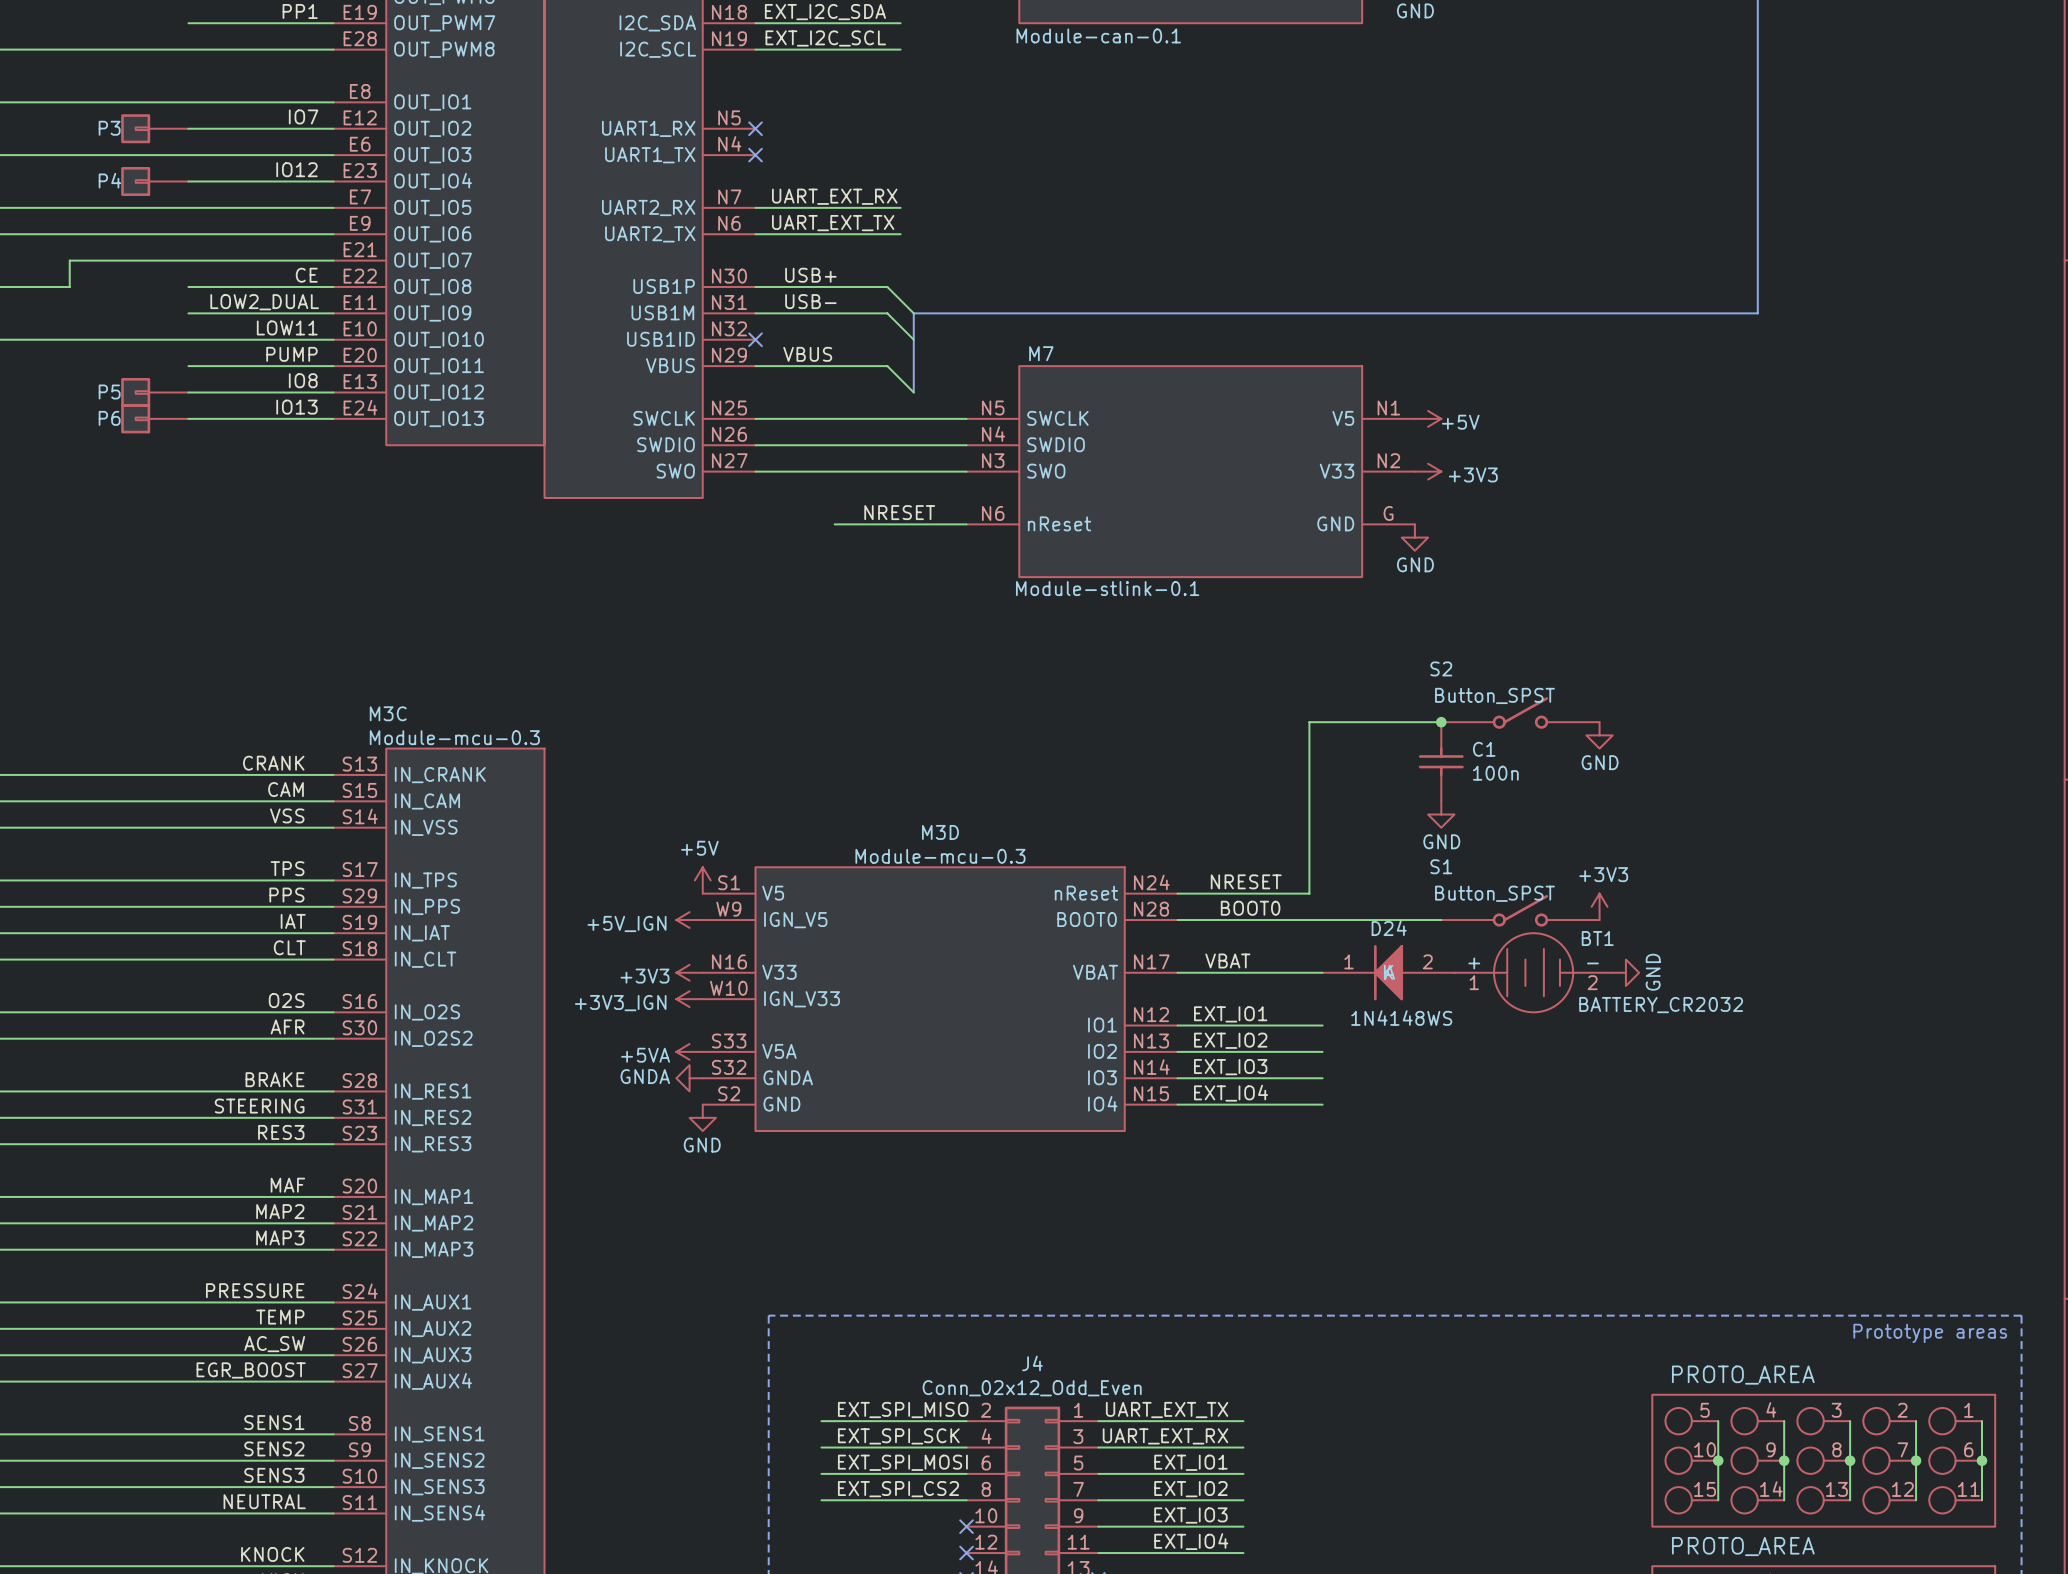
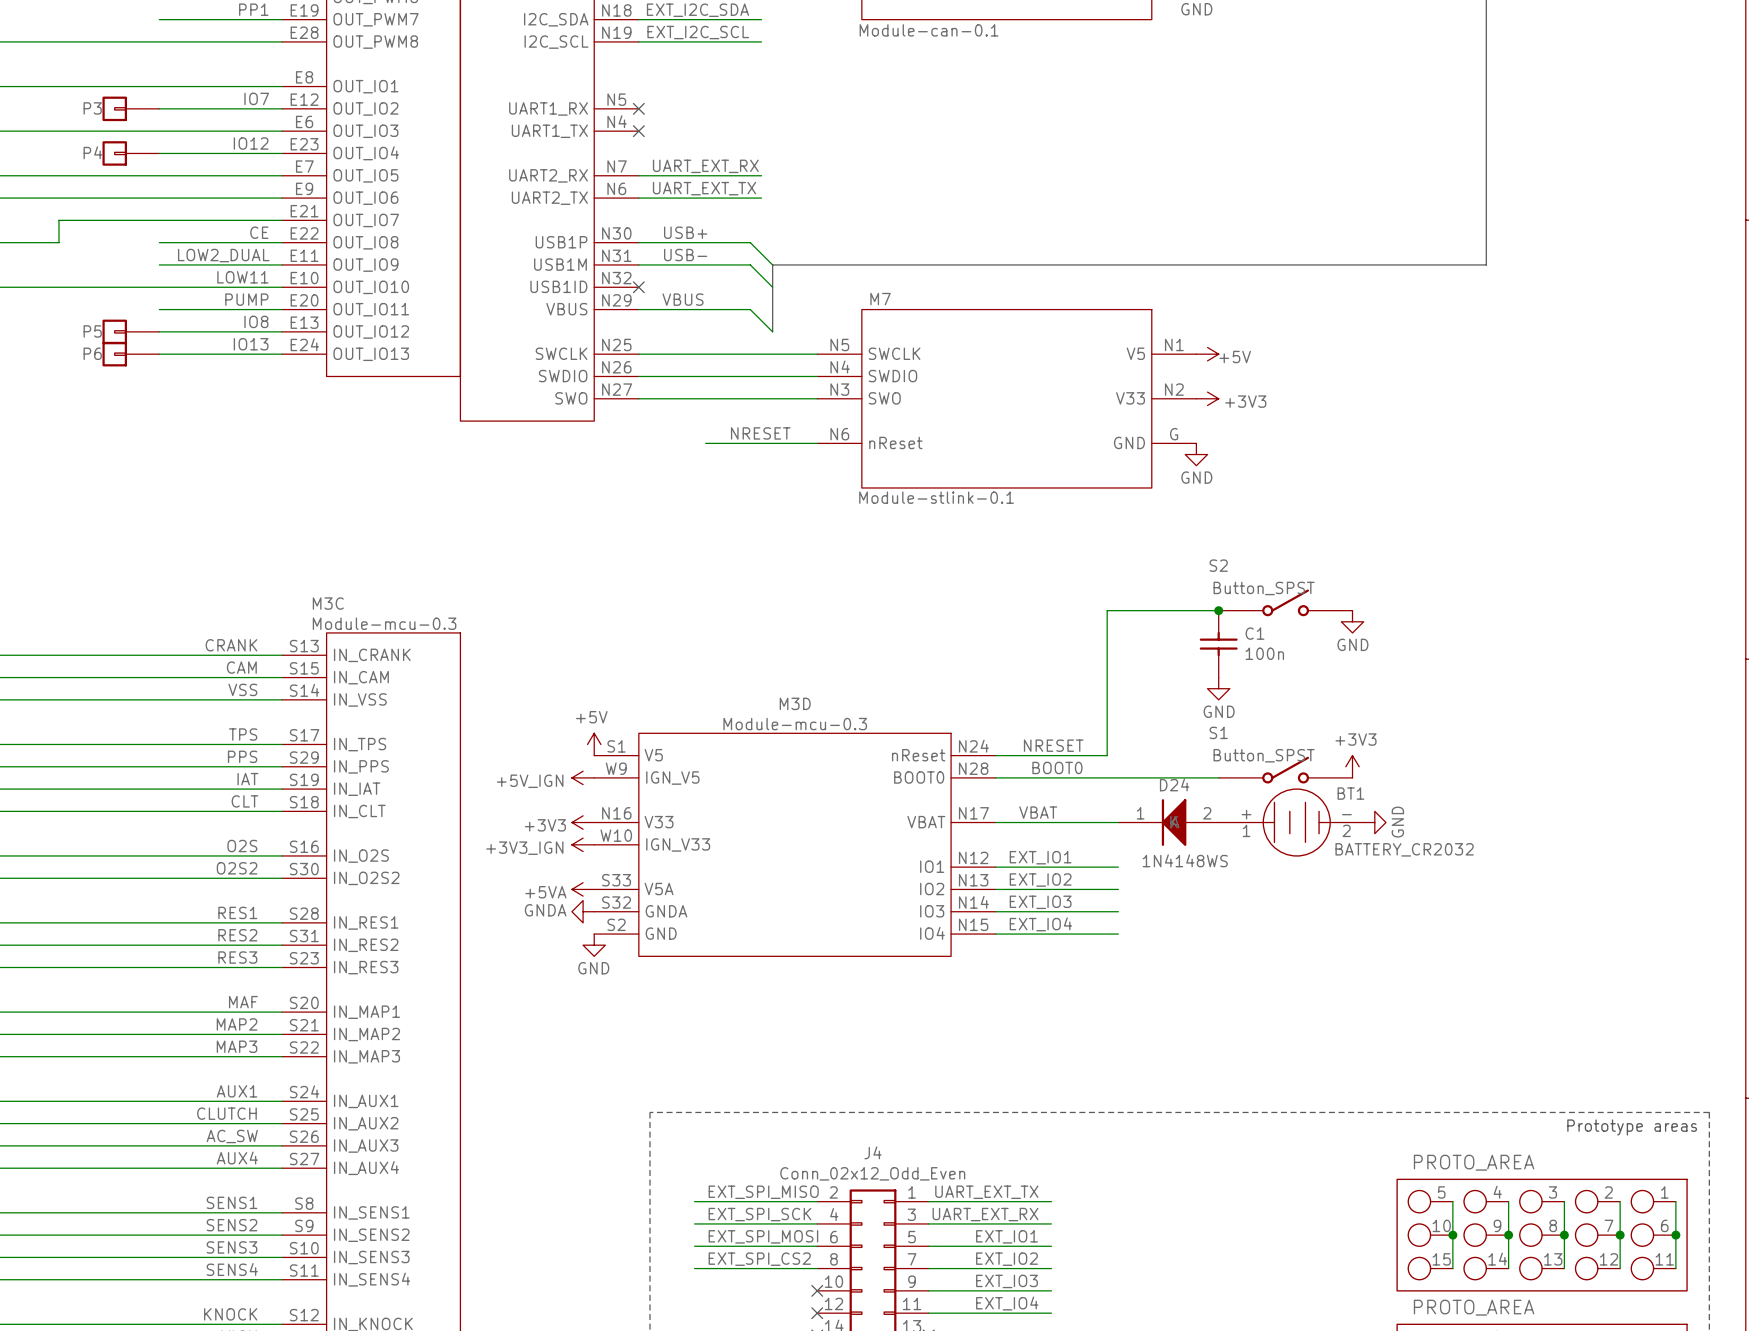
label: AFR (287, 1026) -> O2S2 (237, 868)
label: BRAKE (275, 1079) -> RES1 (237, 912)
label: STEERING (259, 1106) -> RES2 (237, 935)
label: PRESSURE (255, 1290) -> AUX1 (237, 1091)
label: TEMP (280, 1317) -> CLUTCH (226, 1113)
label: EGR_BOOST (251, 1370) -> AUX4 (237, 1157)
label: NEUTRAL (264, 1501) -> SENS4 (232, 1269)

